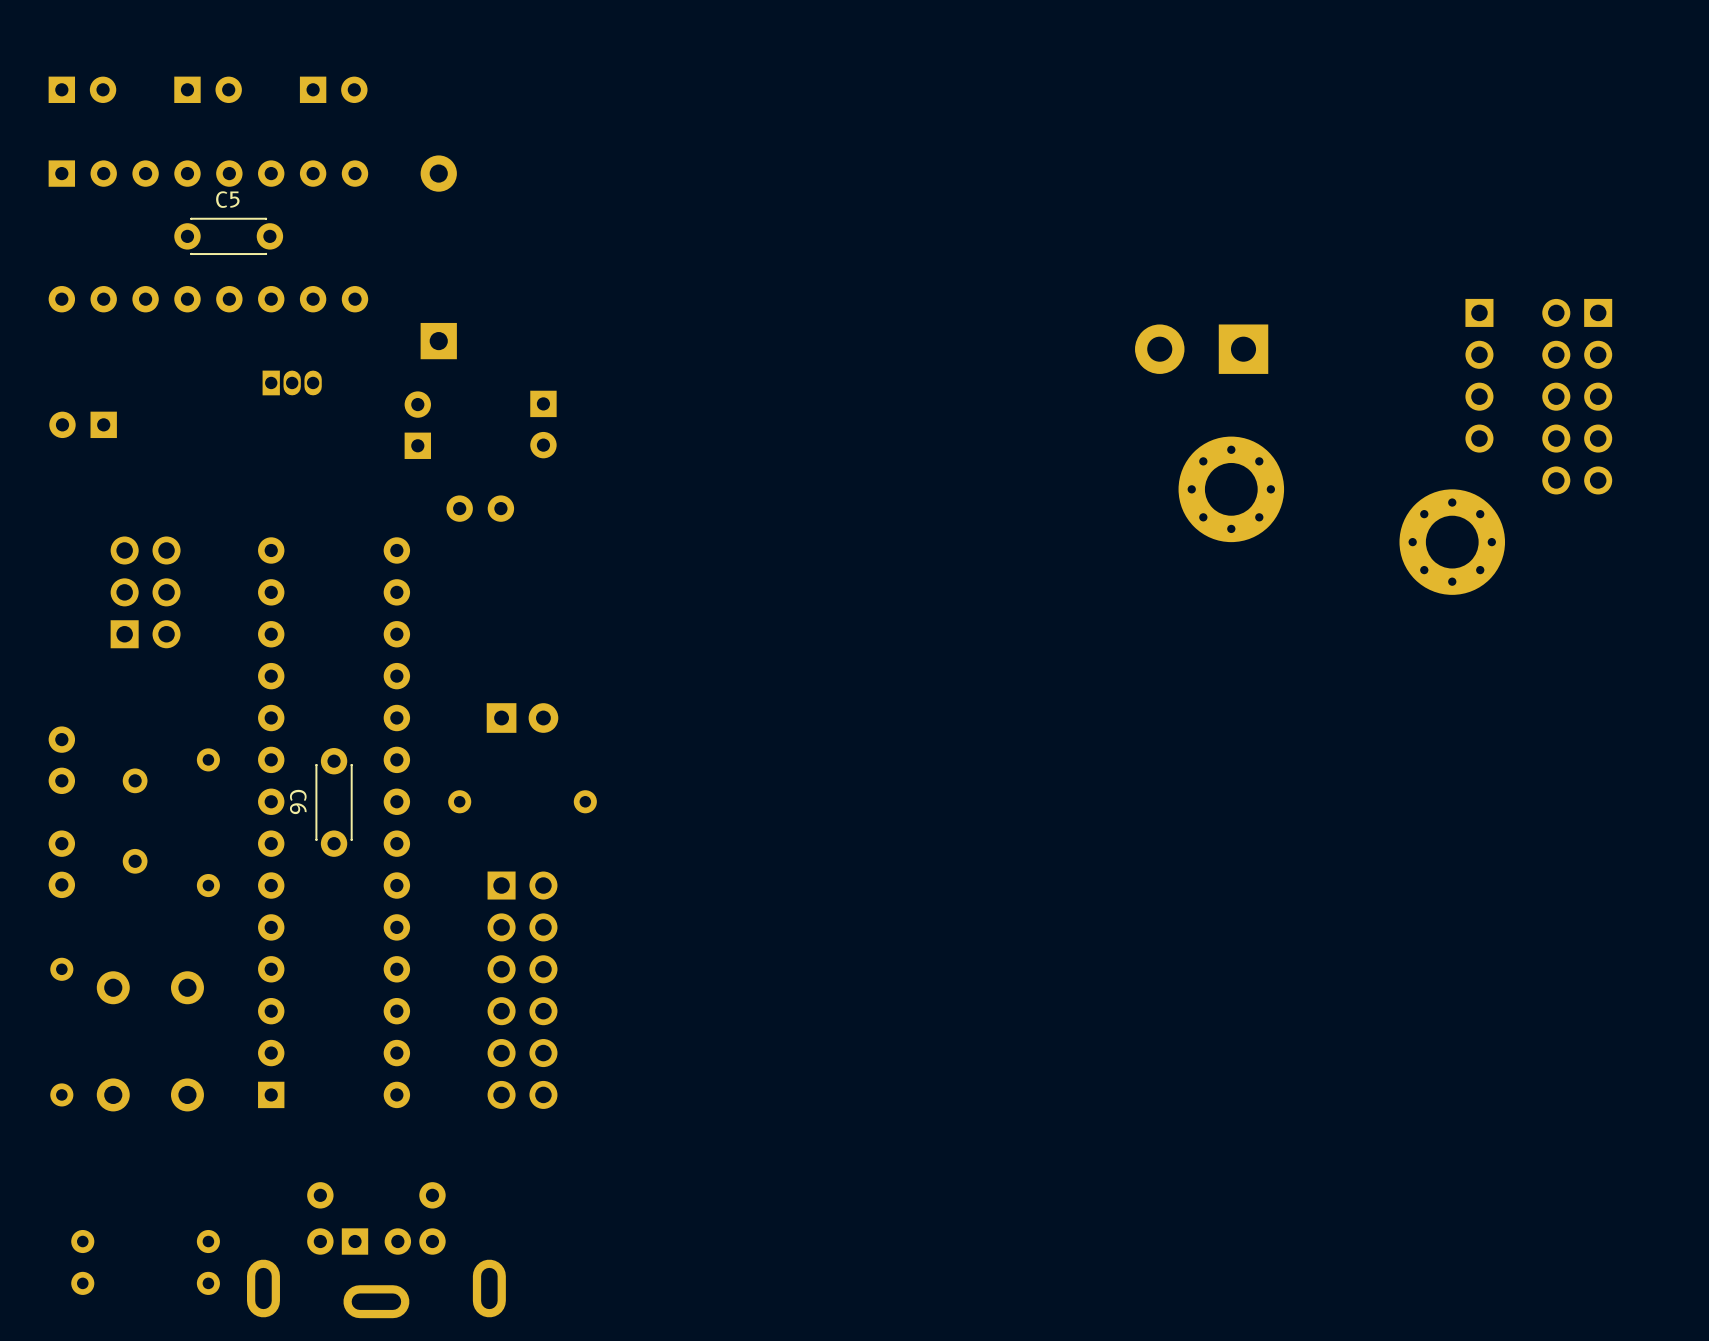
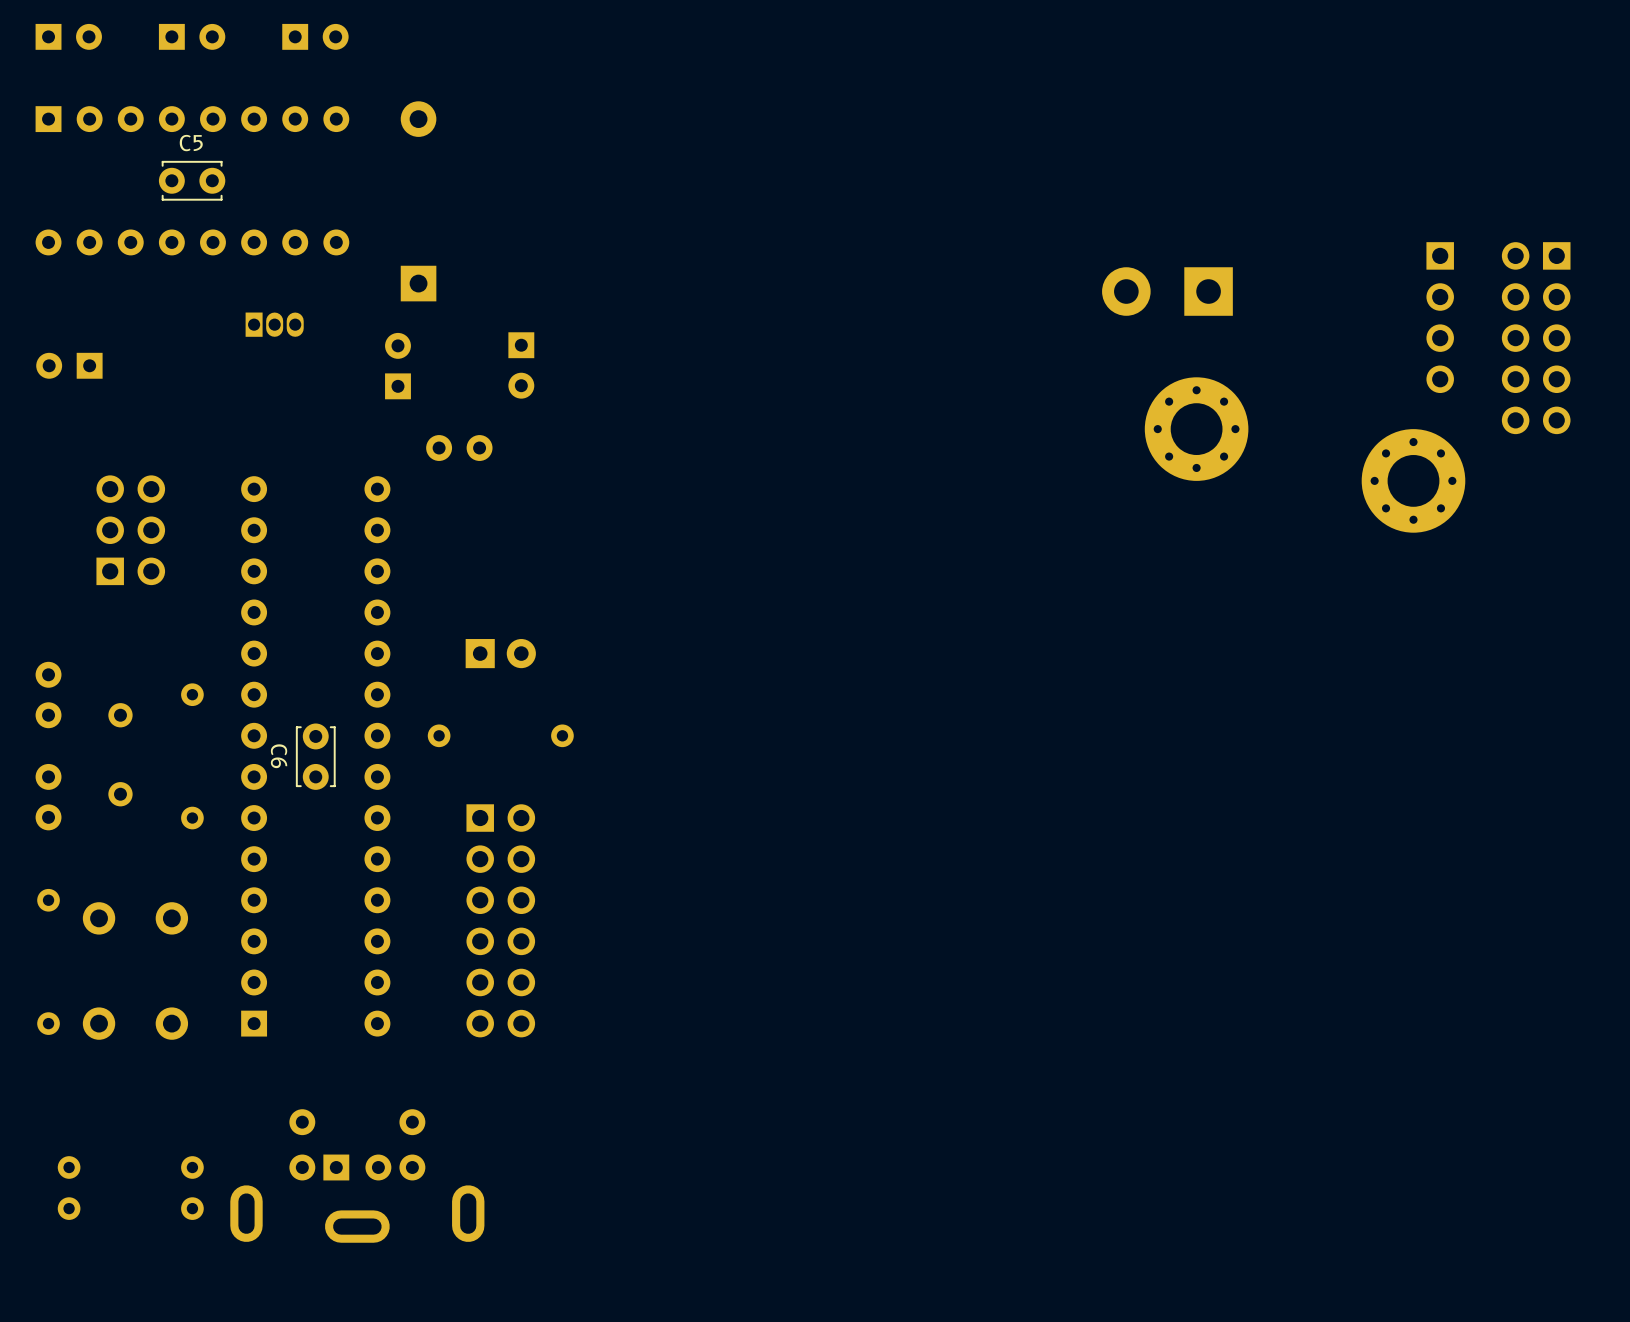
C5 footprint: [174, 217, 284, 256] -> [158, 160, 226, 201]
C6 footprint: [315, 748, 353, 857] -> [295, 723, 336, 790]

